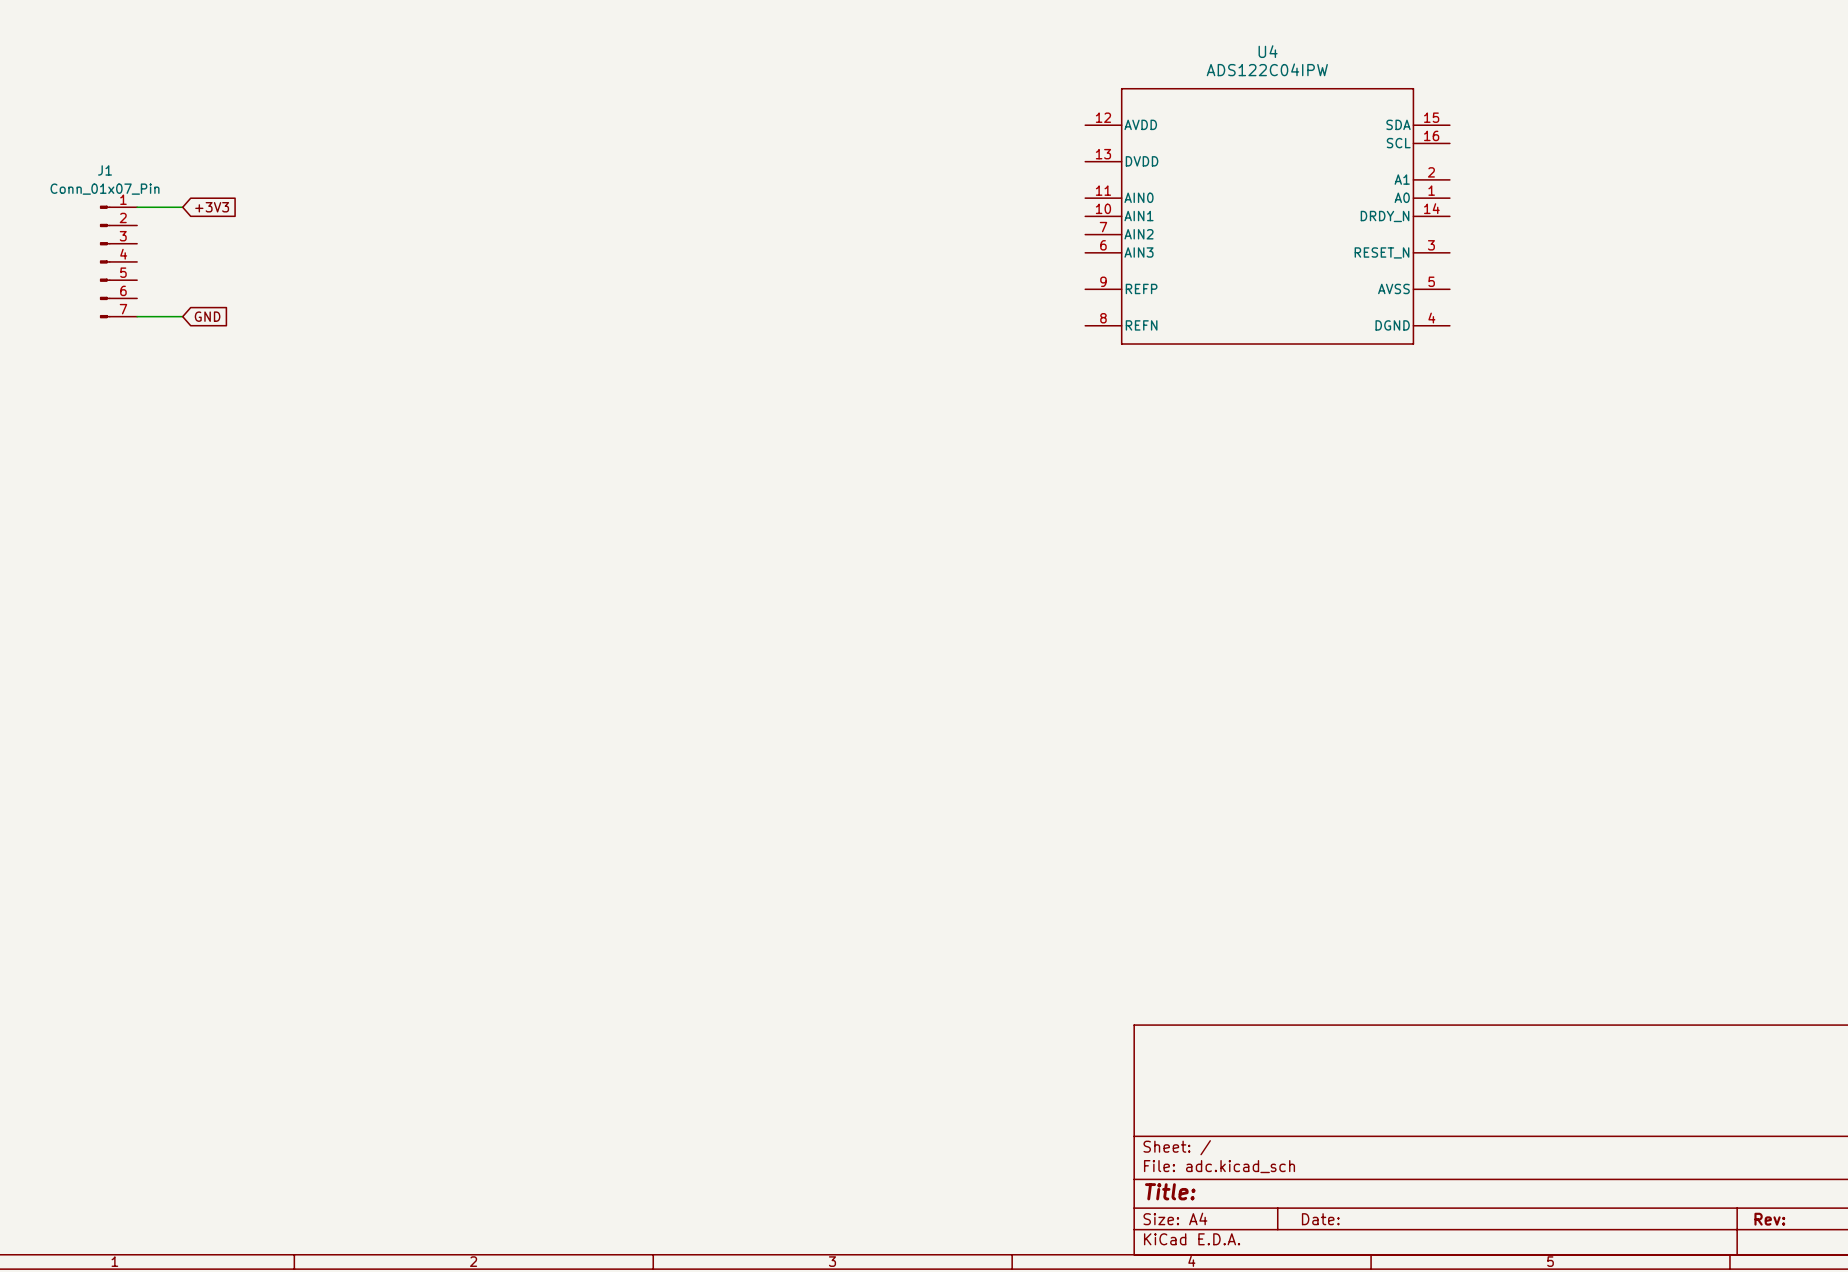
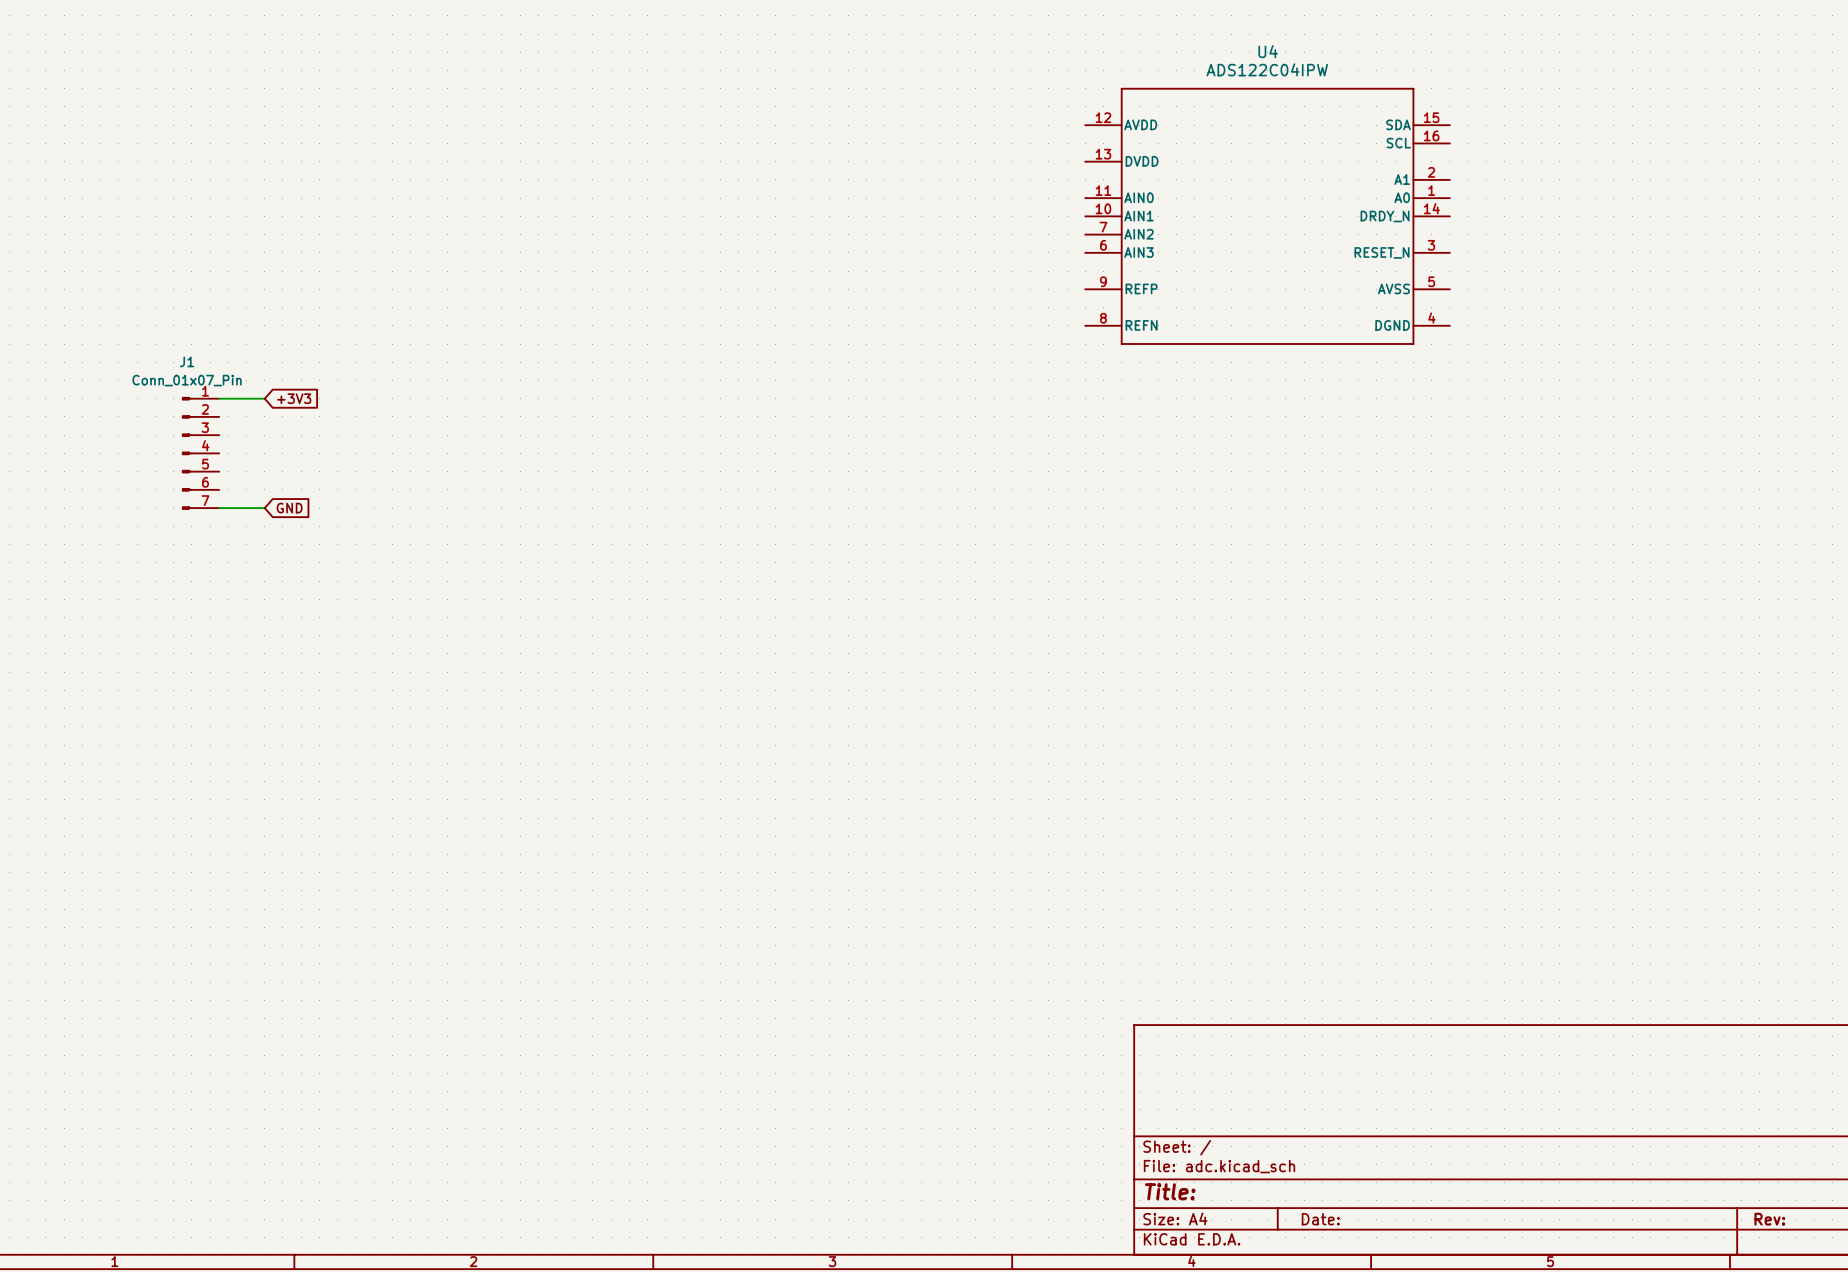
wire: (137, 207) (182, 207) -> none
global label: +3V3 (212, 207) -> none
J1 position: (118, 261) -> (200, 453)
wire: (137, 316) (182, 316) -> (219, 398) (264, 398)
global label: GND (207, 316) -> none
global label: none -> +3V3 (294, 398)
wire: none -> (219, 508) (264, 508)
global label: none -> GND (289, 508)

